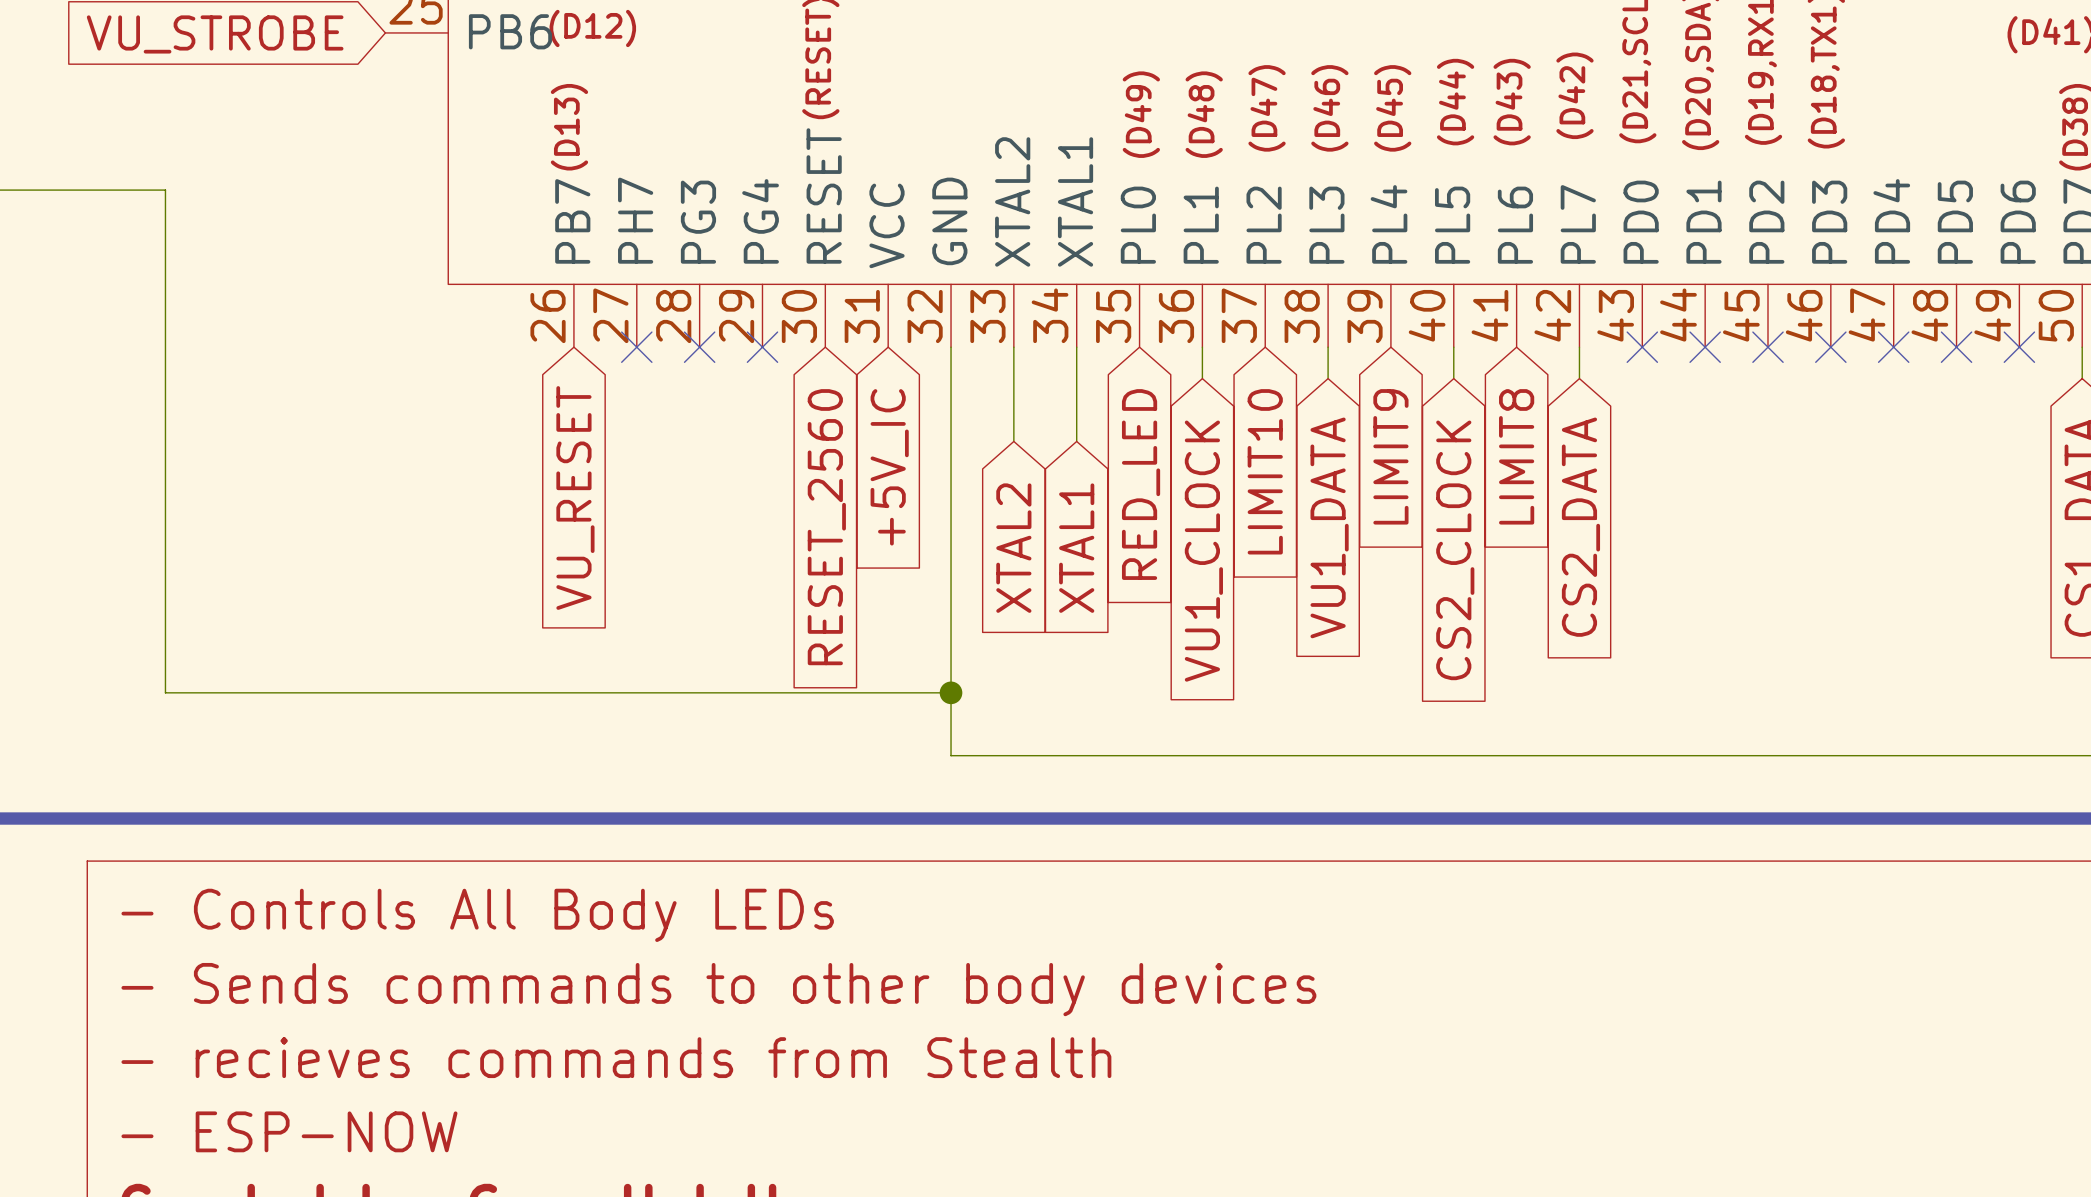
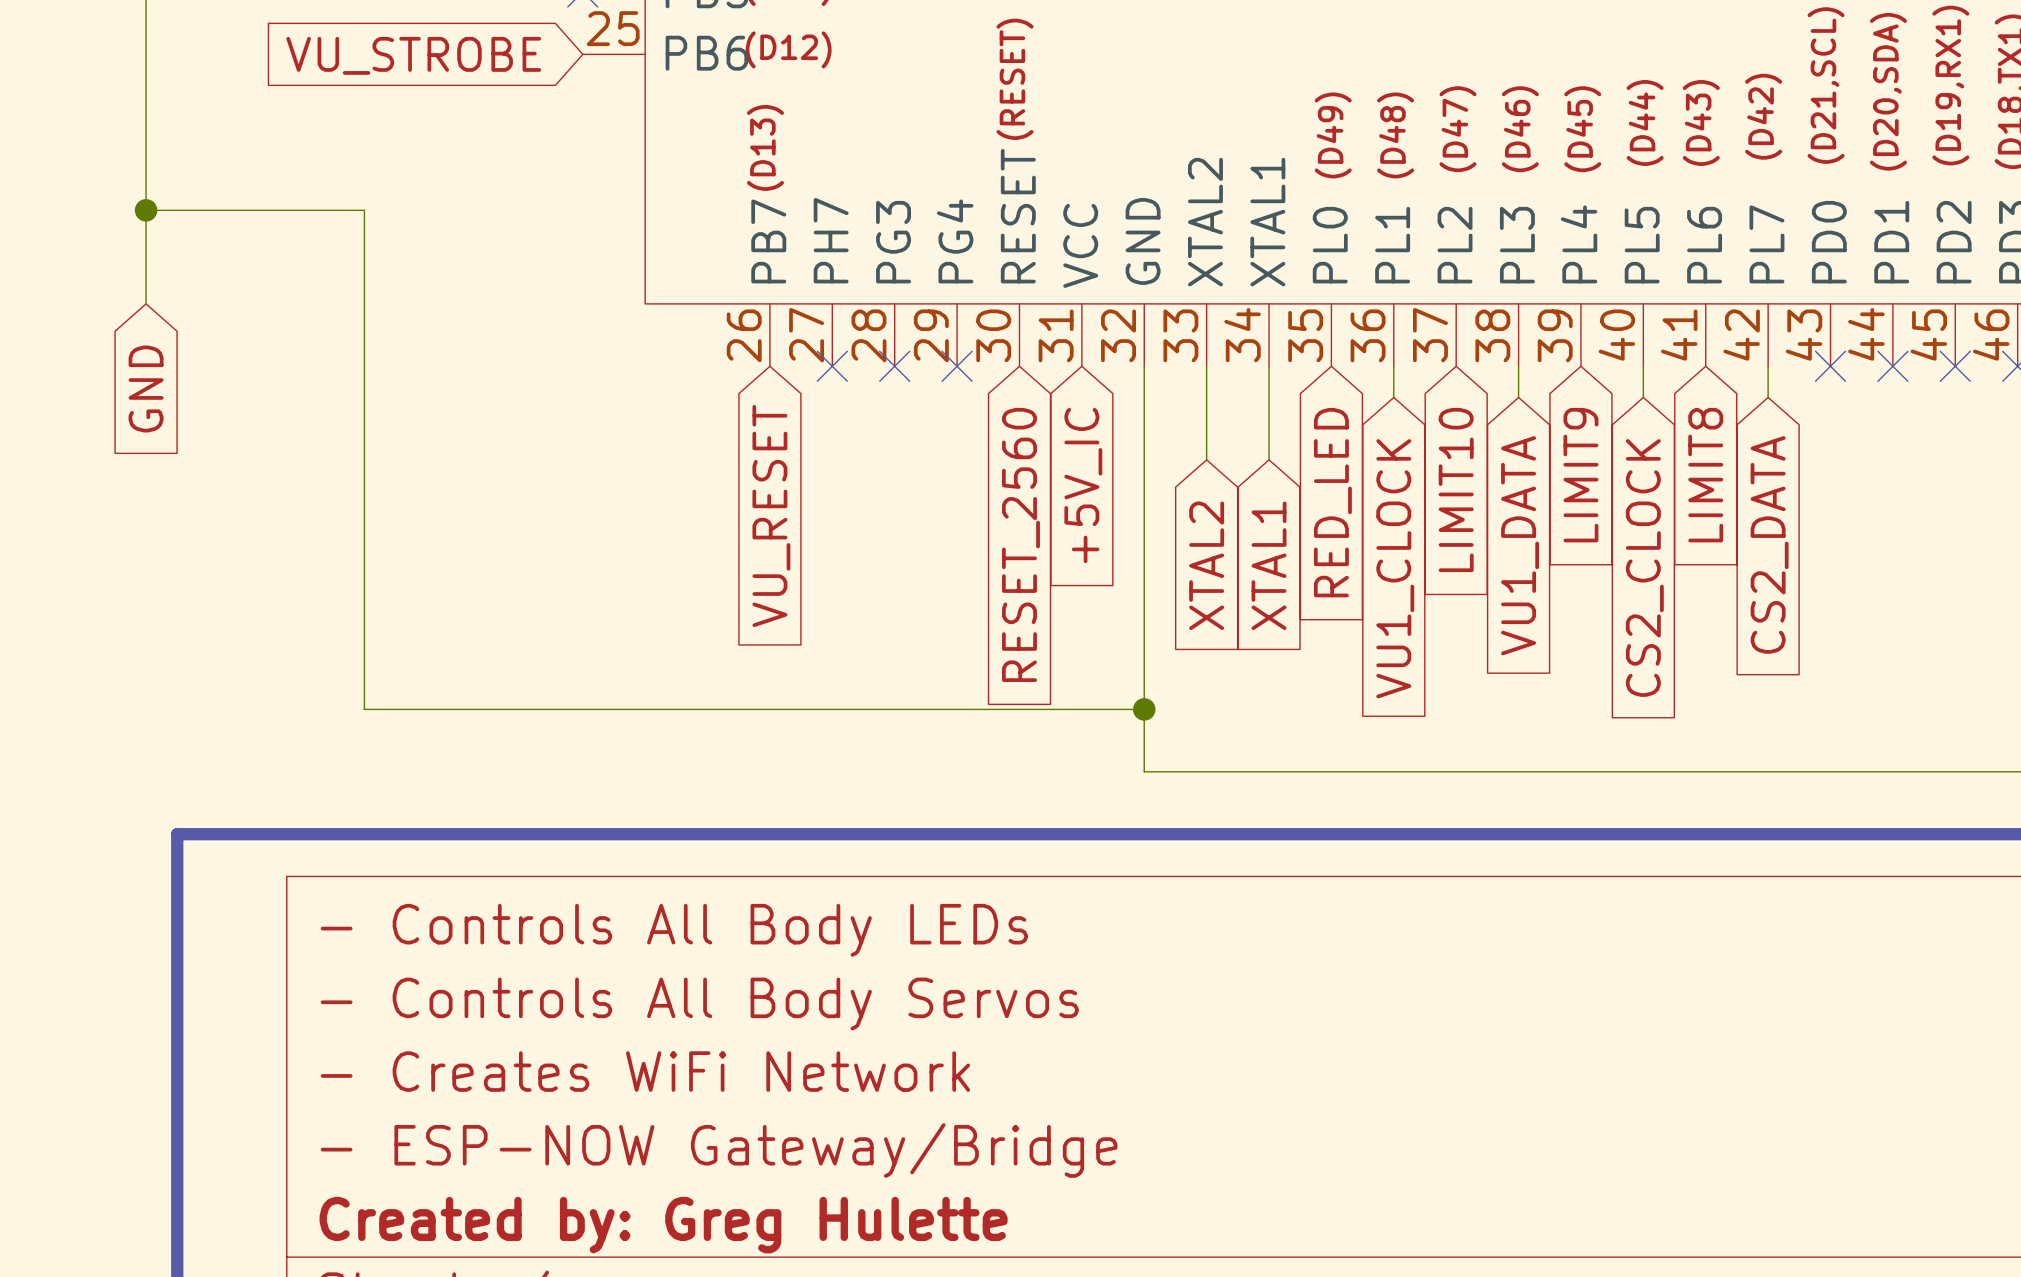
title block: - Sends commands to other body devices (718, 989) -> - Controls All Body Servos (699, 1004)
title block: - recieves commands from Stealth (616, 1057) -> - Creates WiFi Network (645, 1071)
title block: - ESP-NOW (289, 1131) -> - ESP-NOW Gateway/Bridge (719, 1150)

